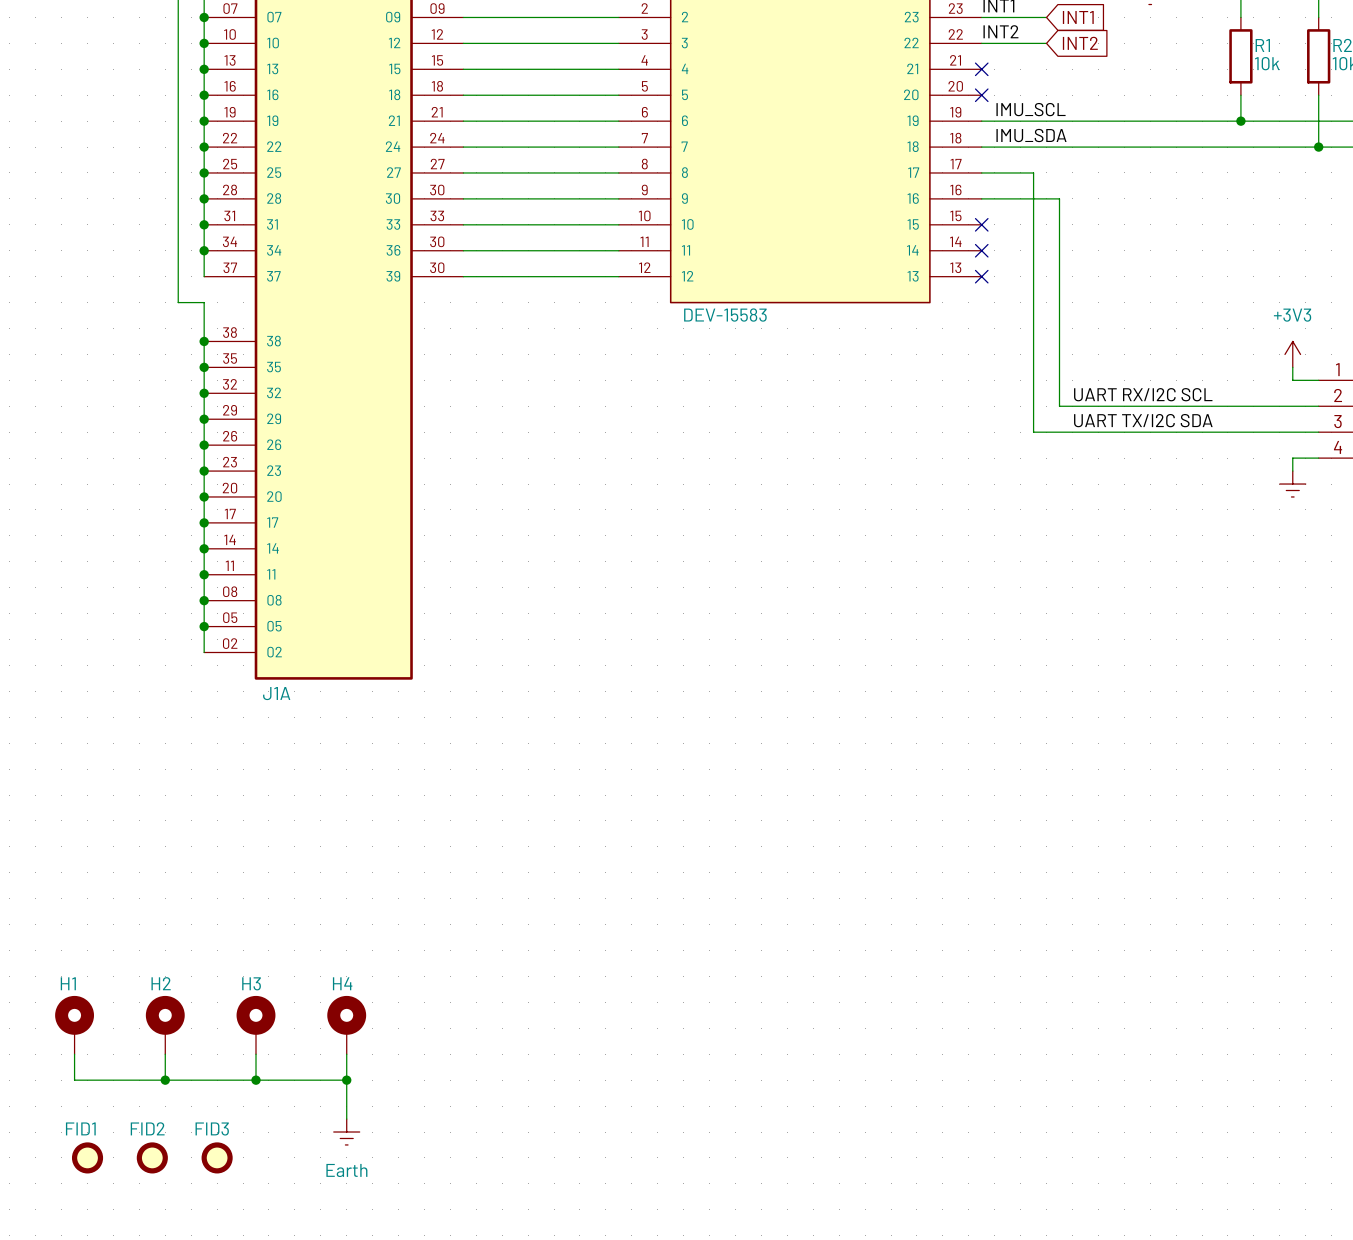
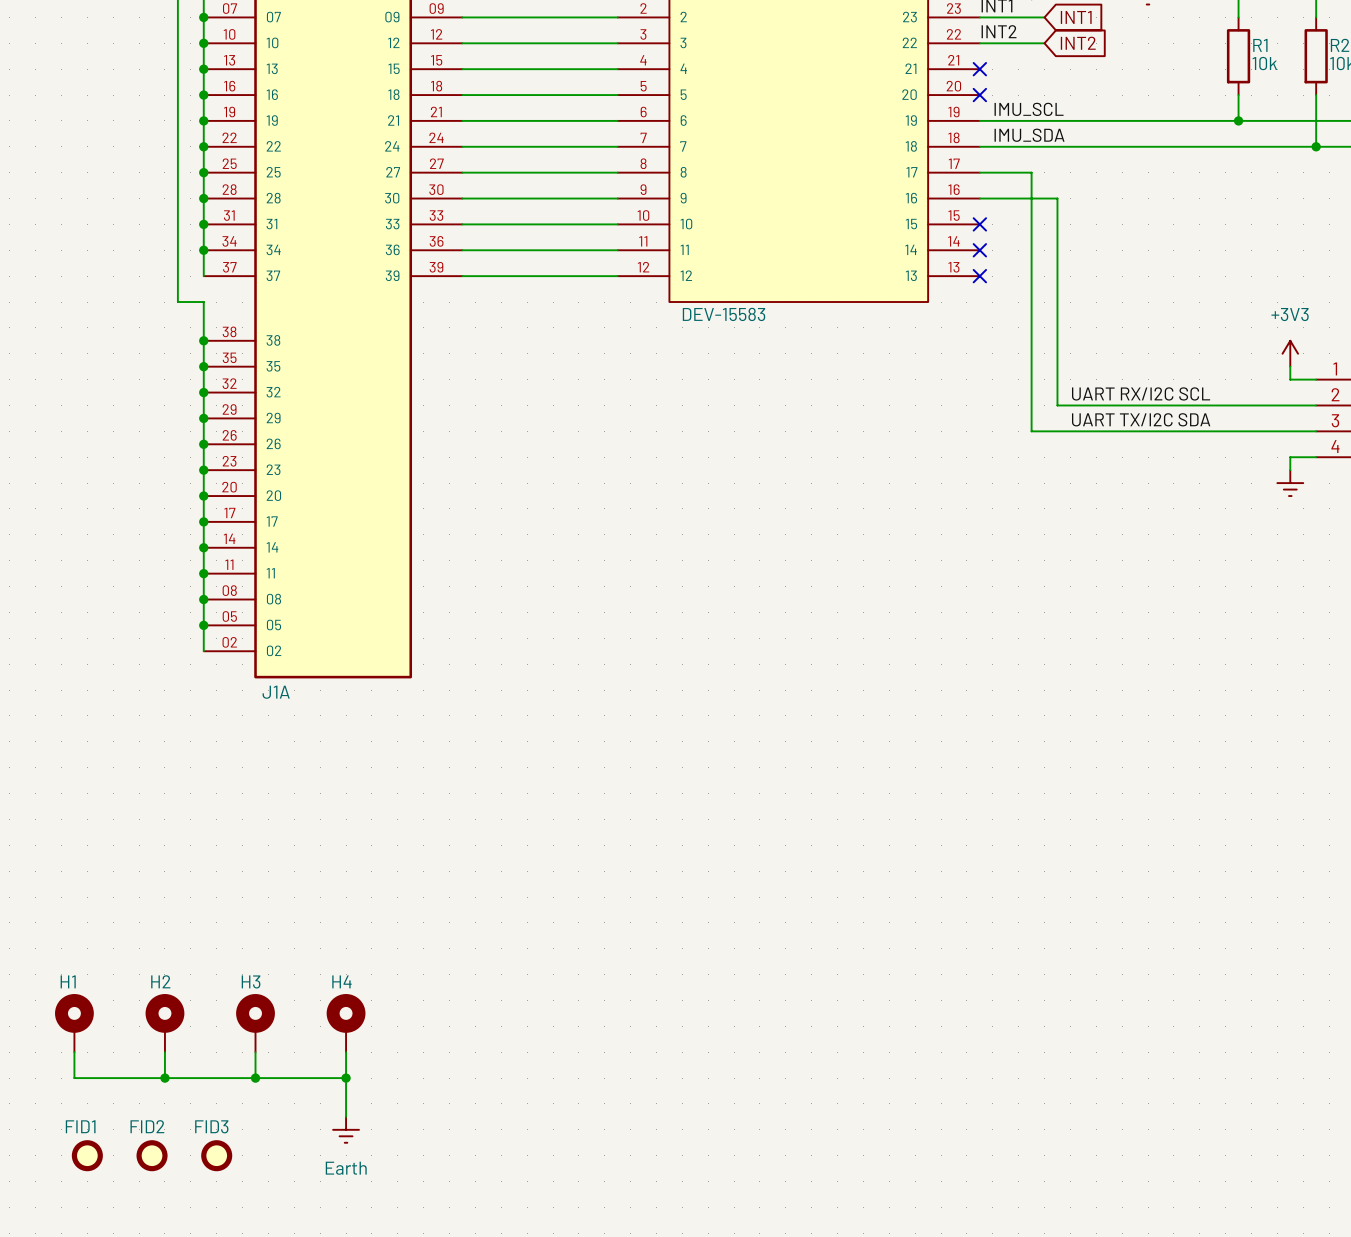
J1A pin number: 30 (437, 241) -> 36 (436, 241)
J1A pin number: 30 (437, 267) -> 39 (436, 267)

